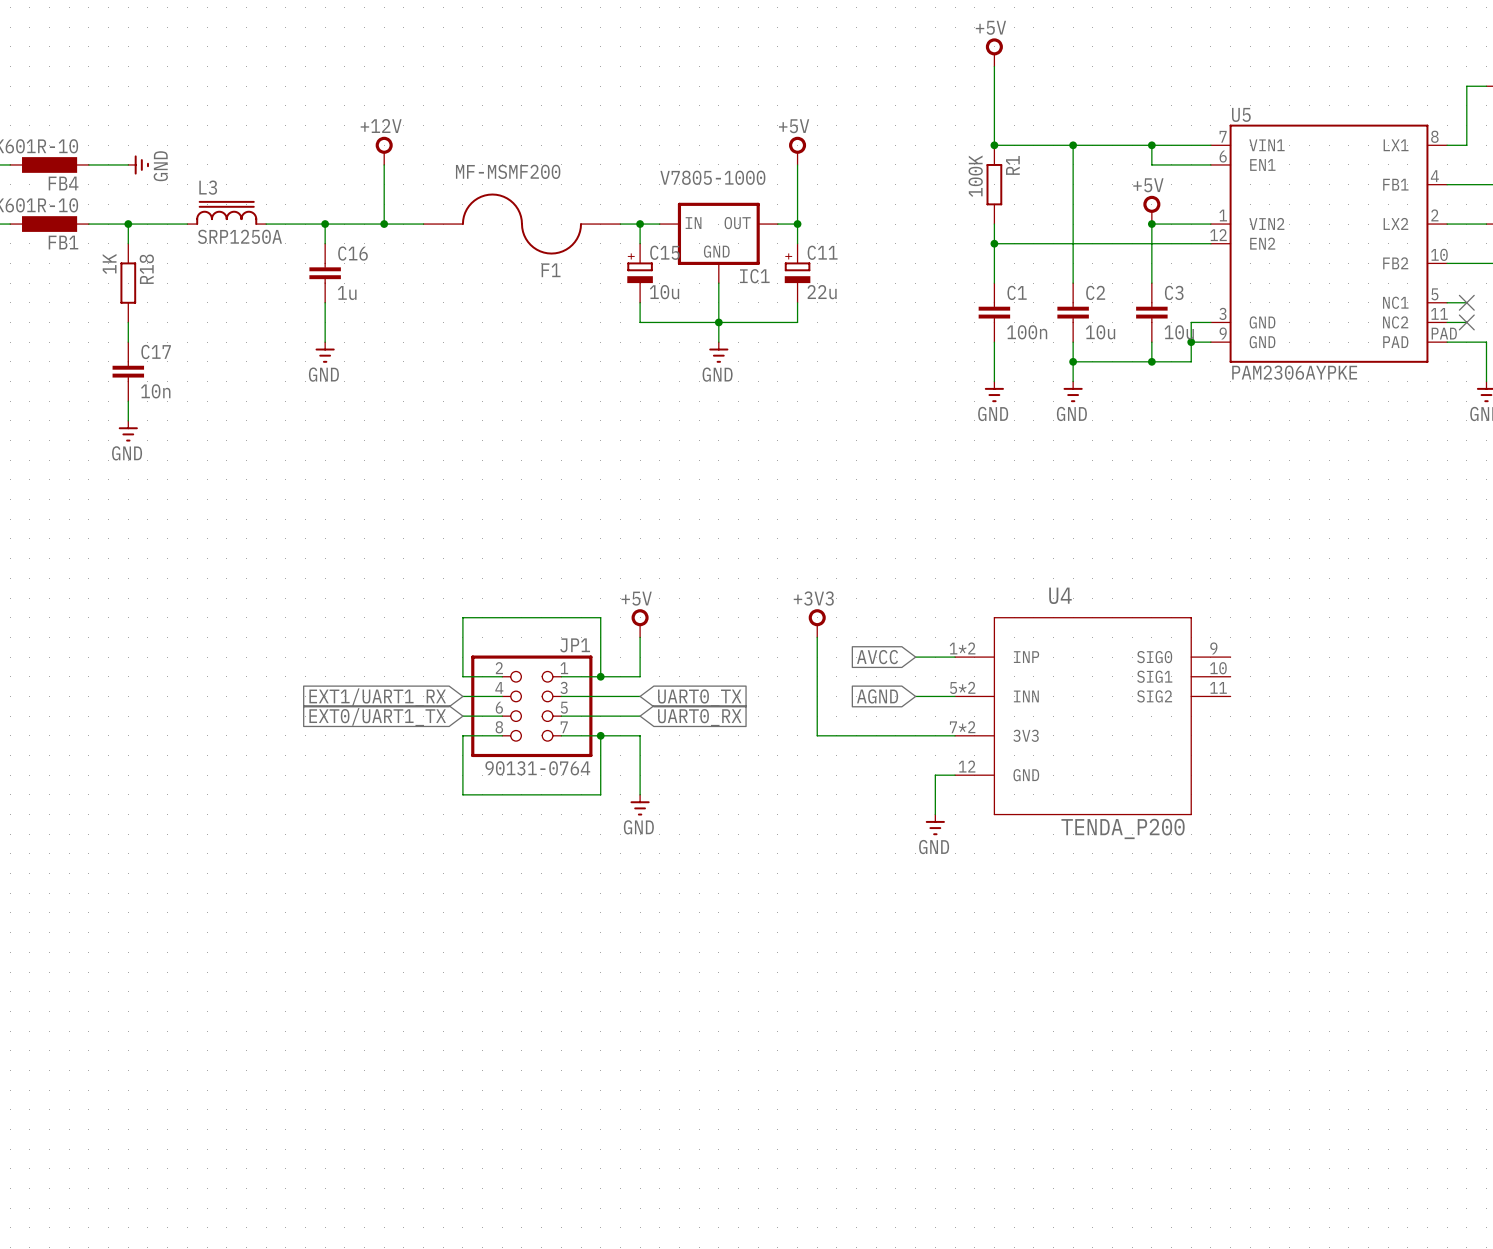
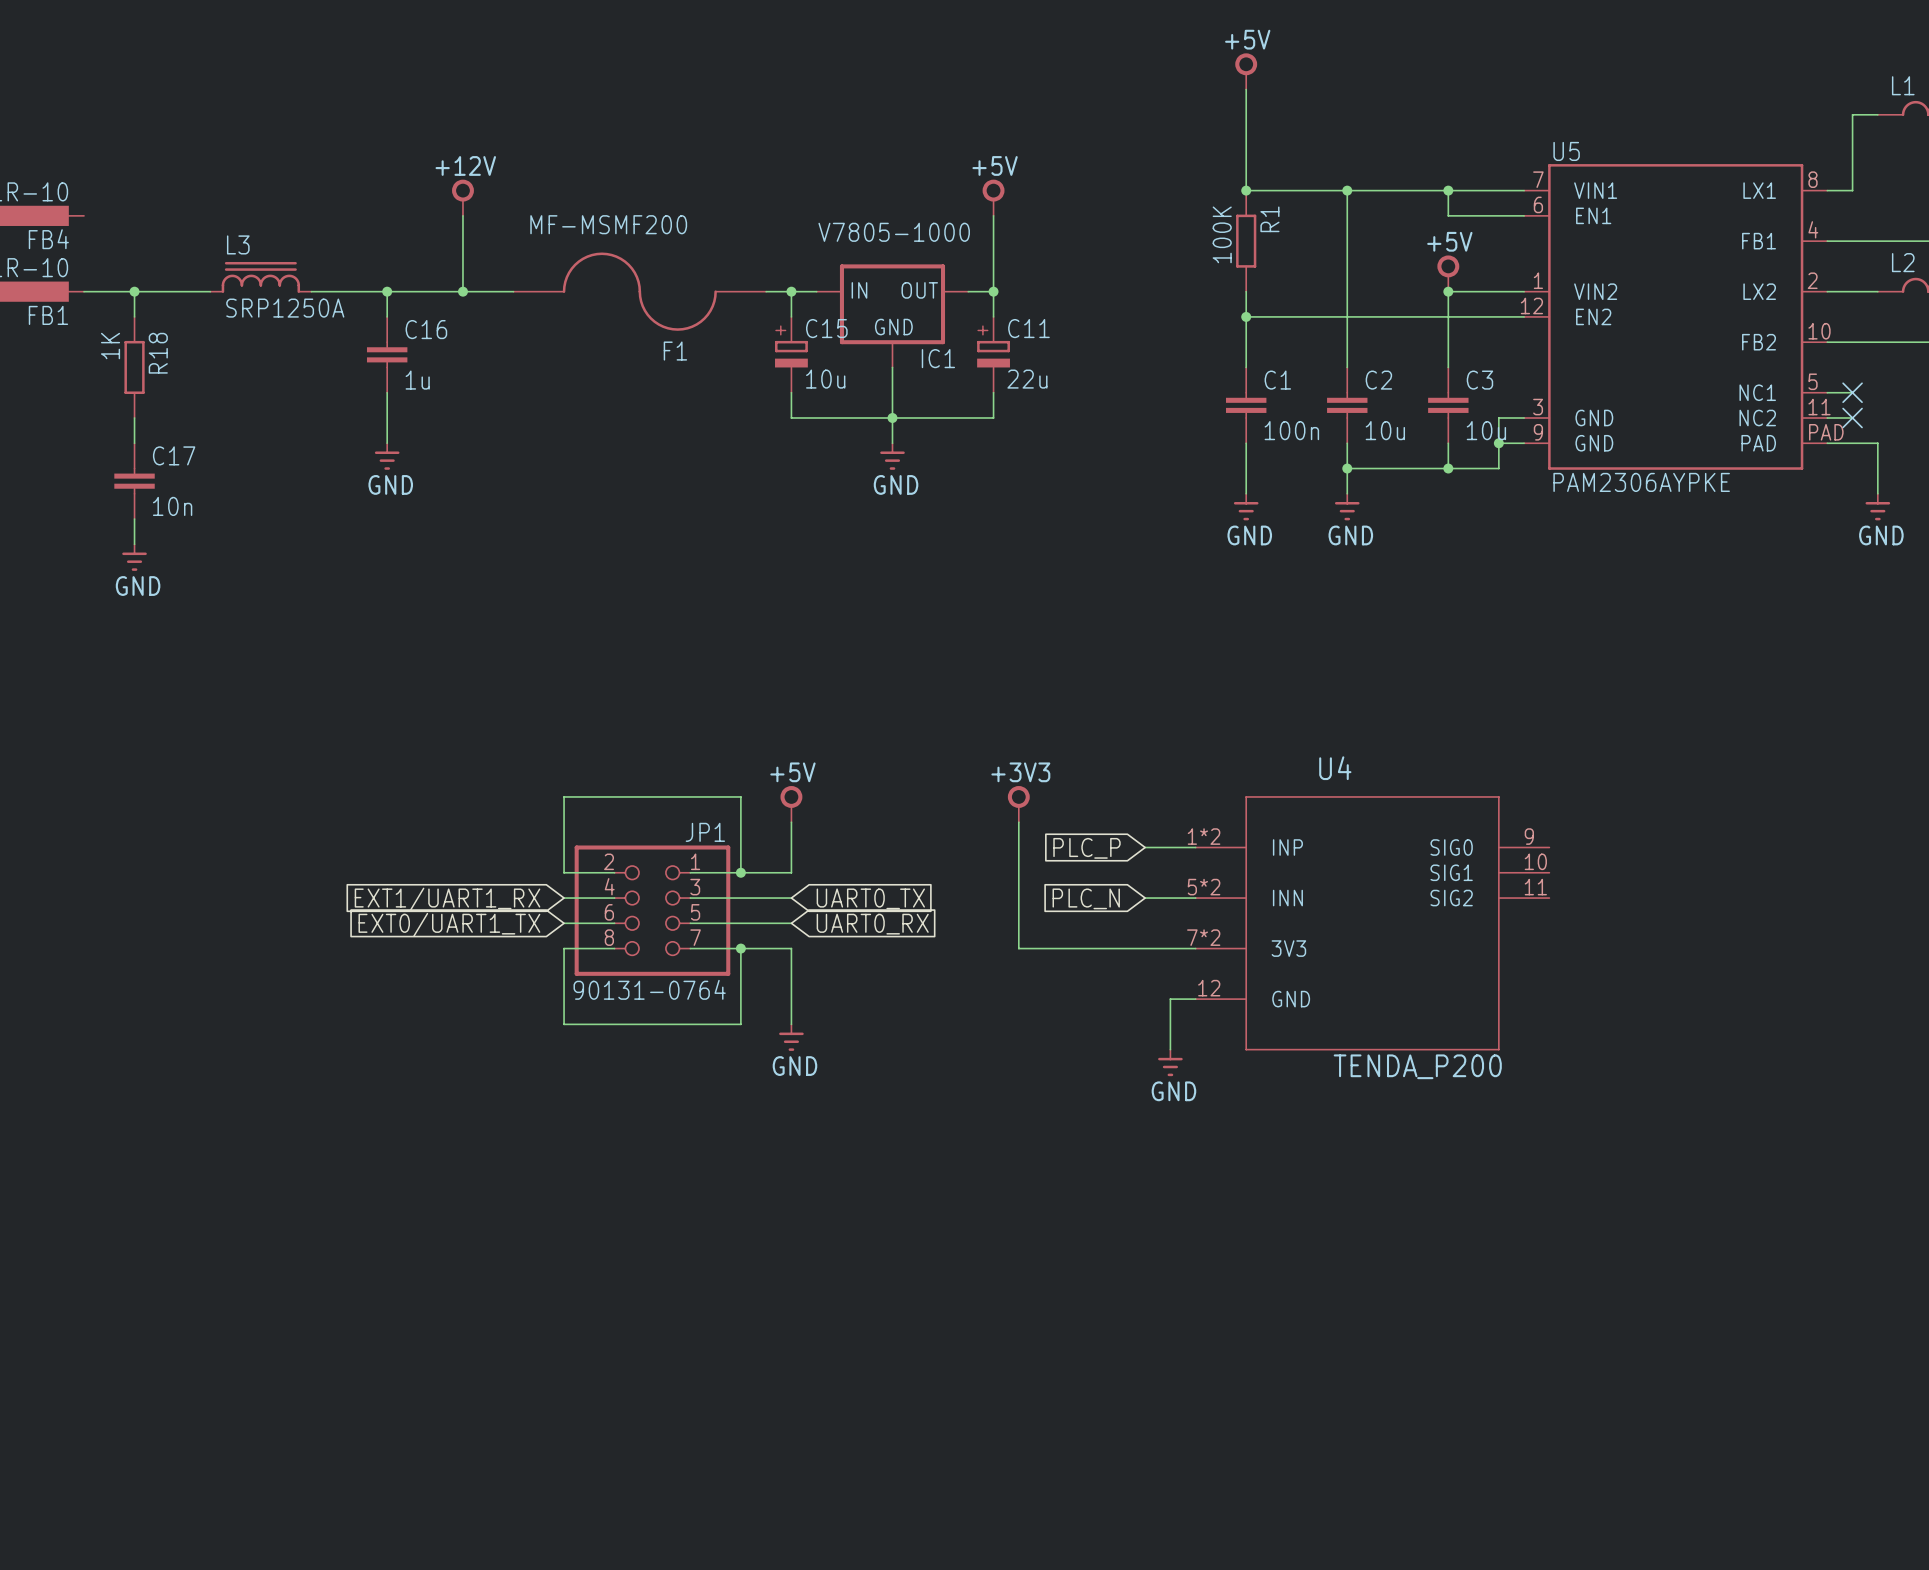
wire: (88, 164) (128, 164) -> none
power symbol: GND (138, 164) -> none
global label: AVCC (877, 657) -> PLC_P (1086, 848)
global label: AGND (877, 696) -> PLC_N (1086, 898)

